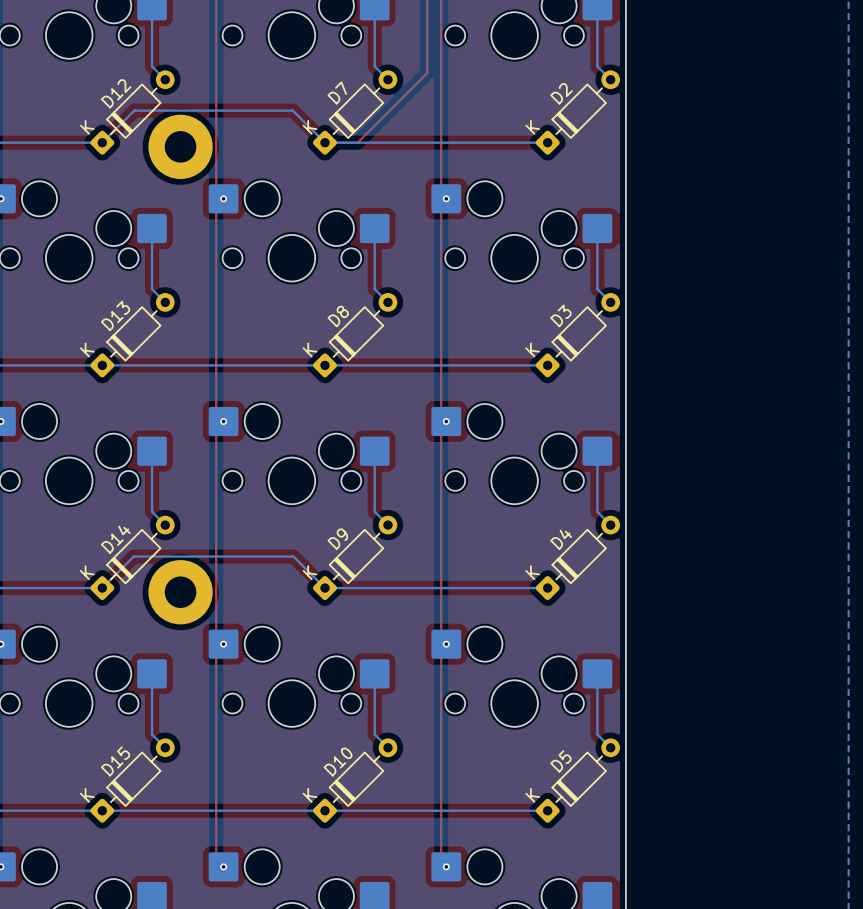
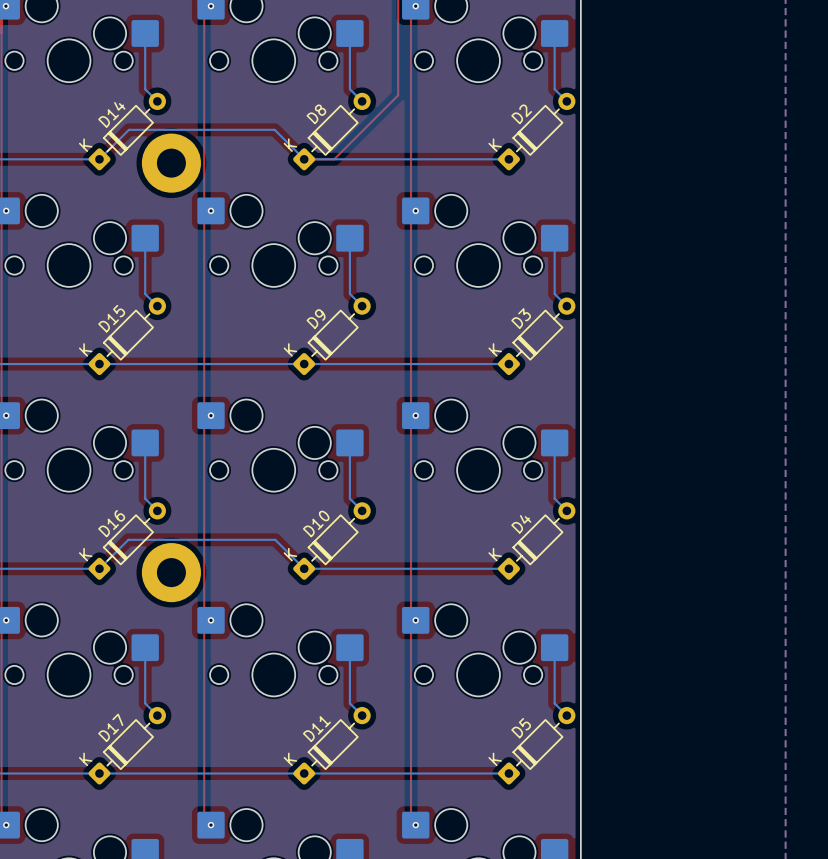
D7 name: D7 (337, 92) -> D8 (316, 114)
D12 name: D12 (116, 93) -> D14 (111, 114)
D13 name: D13 (115, 315) -> D15 (111, 318)
D8 name: D8 (338, 316) -> D9 (316, 319)
D14 name: D14 (115, 539) -> D16 (111, 523)
D9 name: D9 (337, 539) -> D10 (316, 523)
D15 name: D15 (115, 761) -> D17 (110, 727)
D10 name: D10 (338, 762) -> D11 (316, 729)

